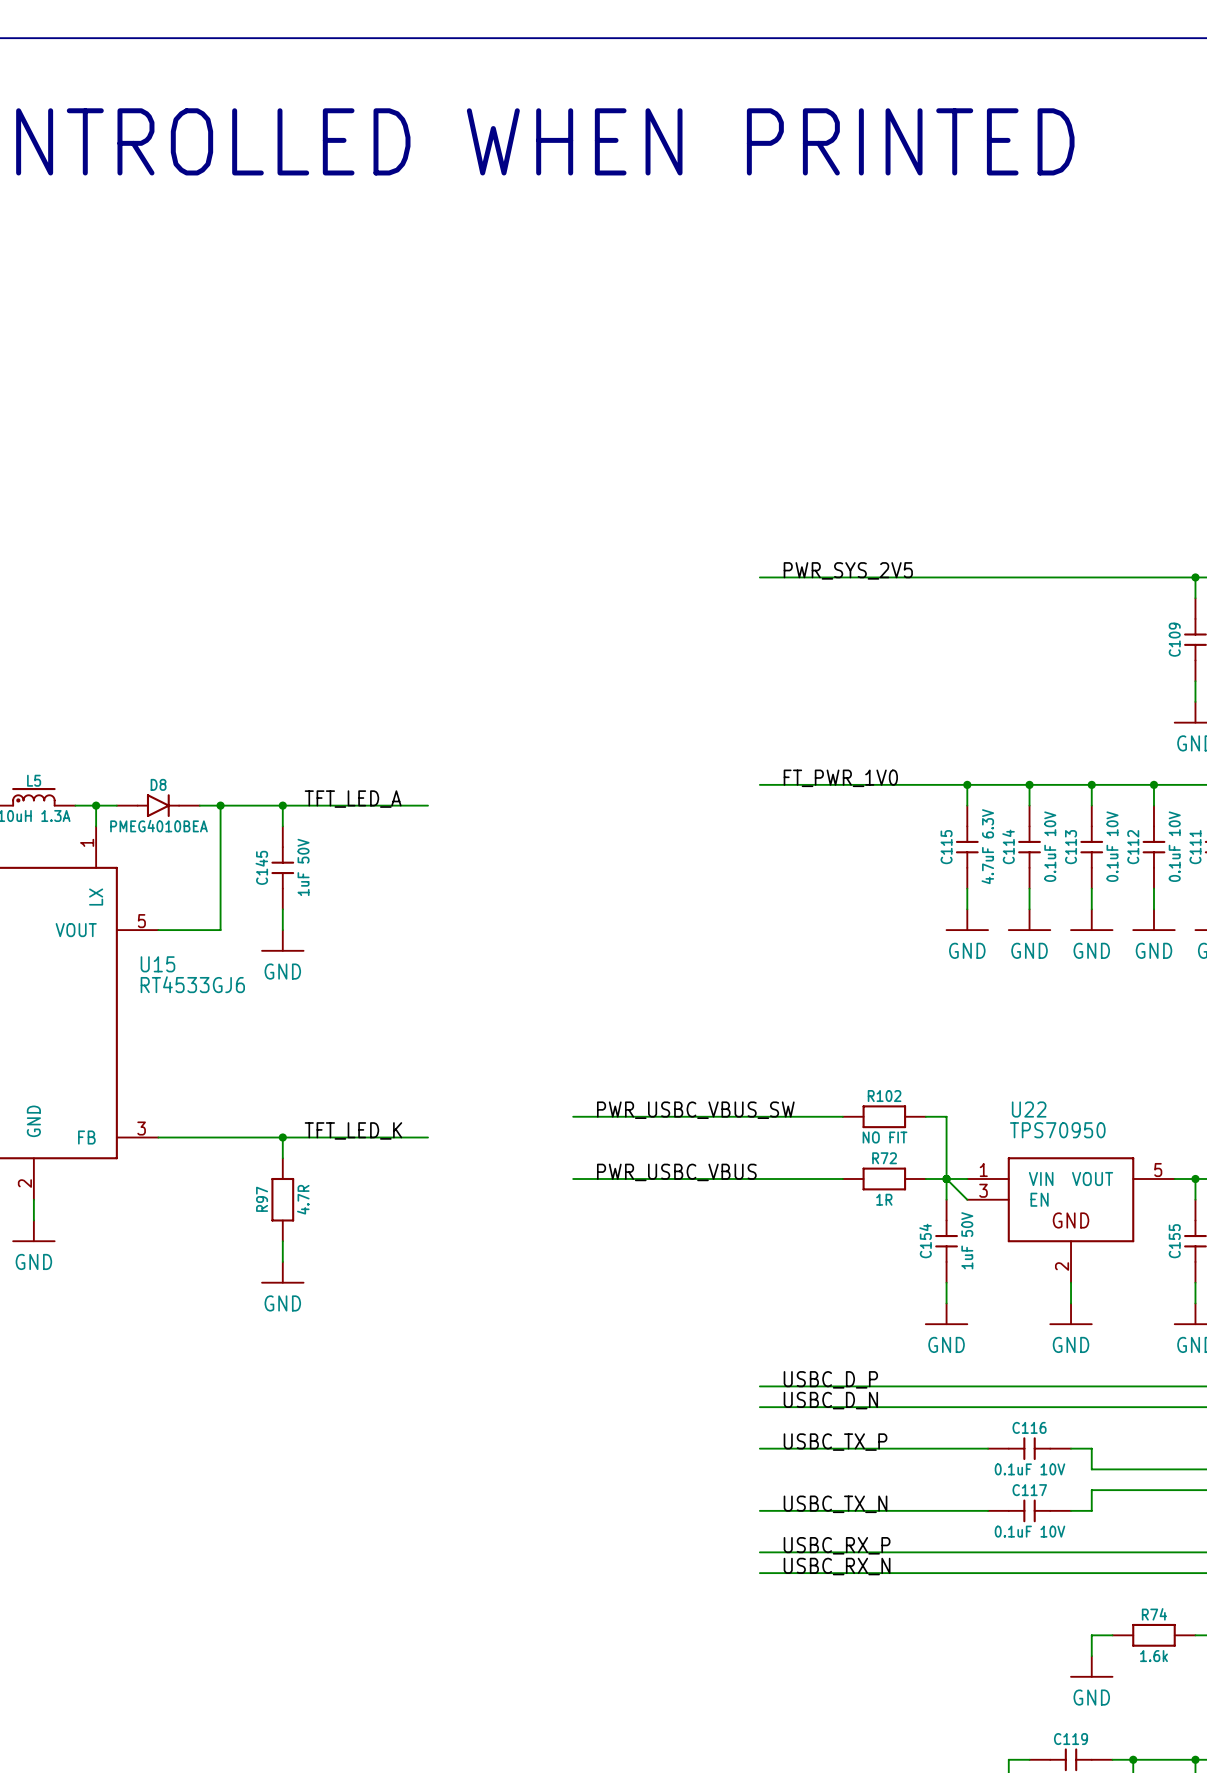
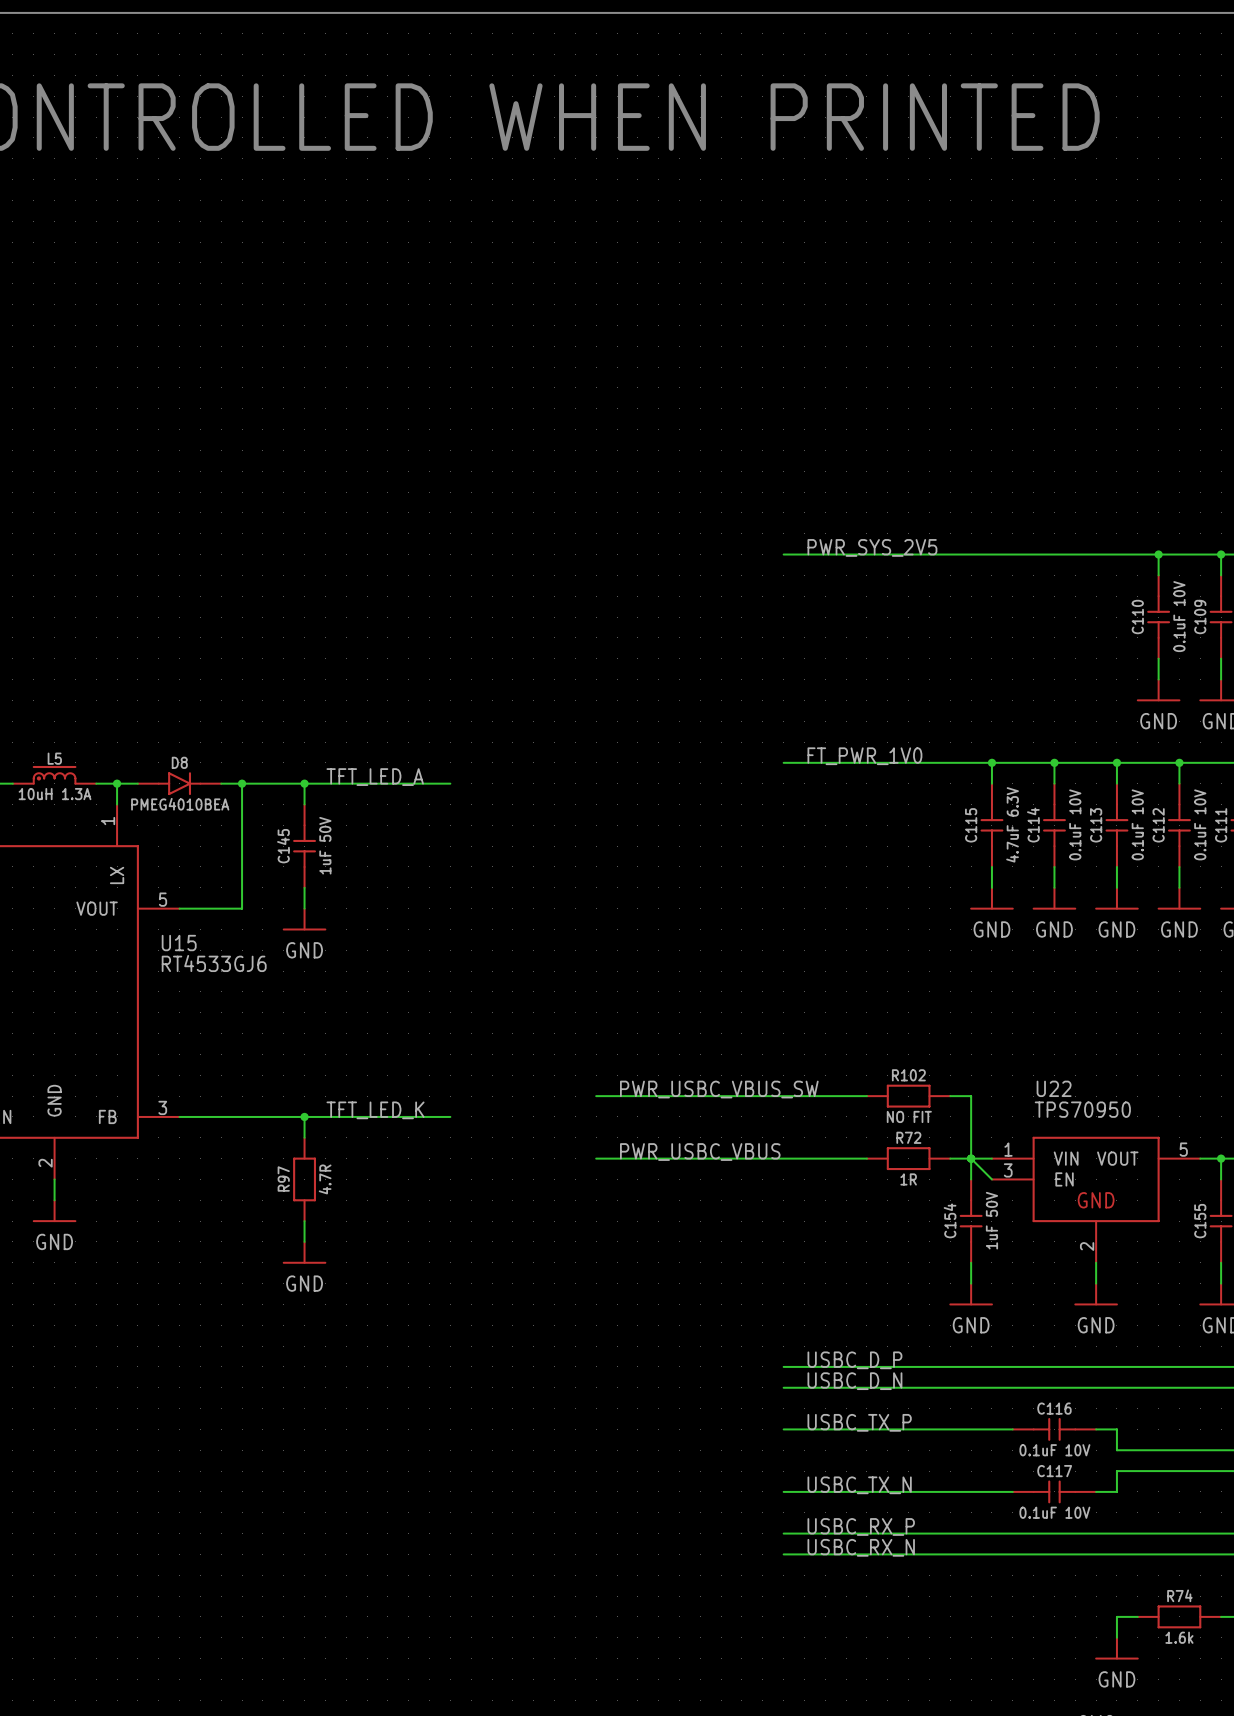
wire: none -> (1158, 554) (1158, 575)
junction: none -> (1158, 554)
C110: none -> 0.1uF 10V (1158, 617)
wire: none -> (1158, 658) (1158, 679)
power symbol: none -> GND (1158, 690)

